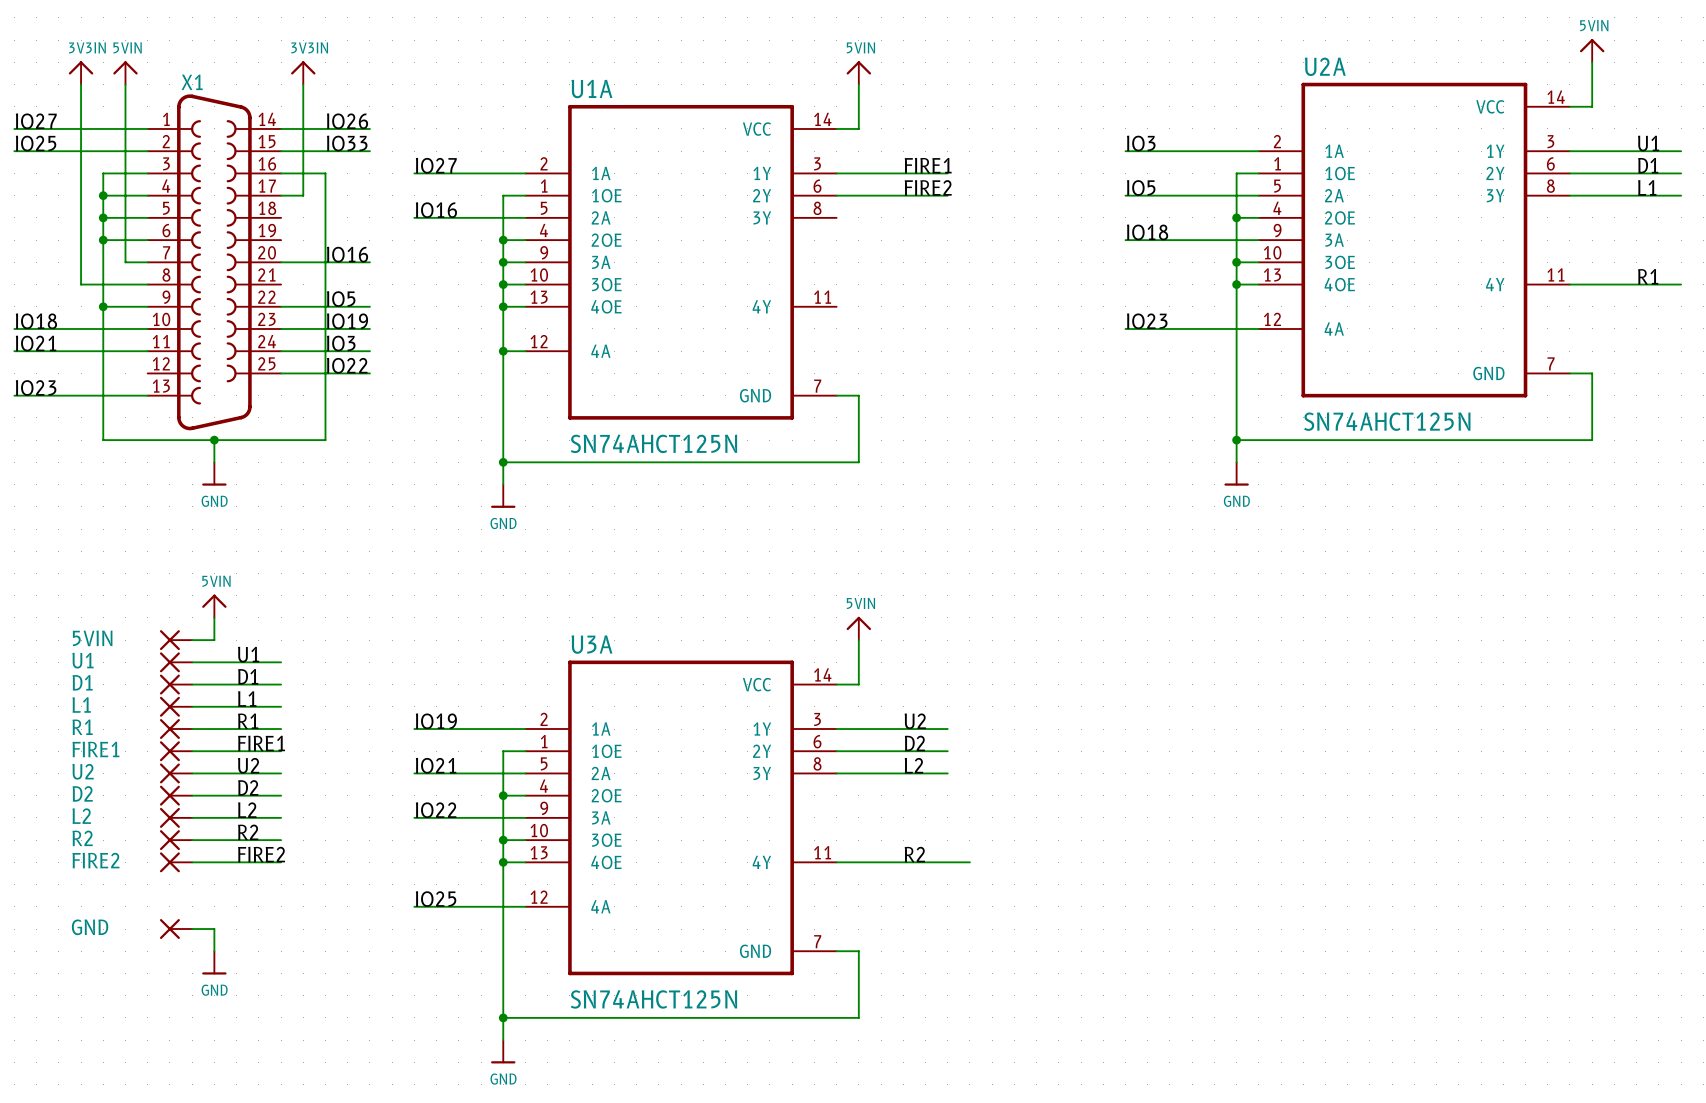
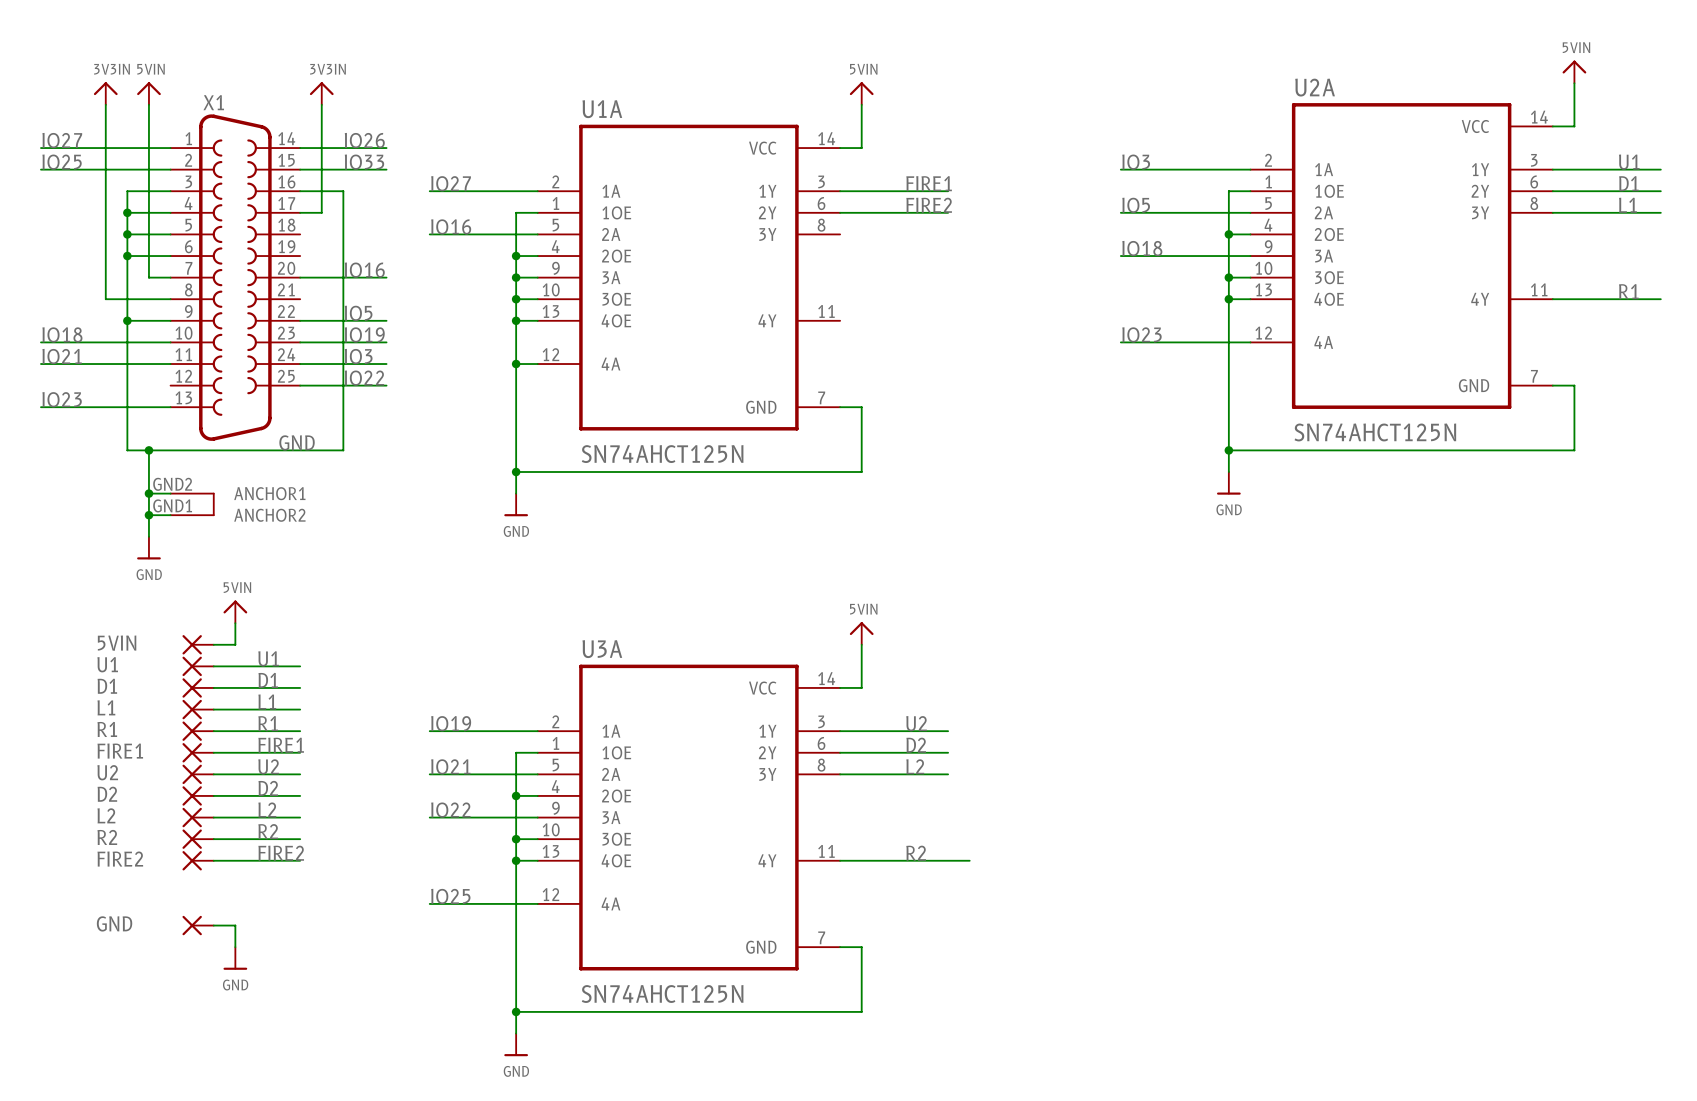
X1 symbol: [147, 94, 282, 431] -> [170, 114, 301, 516]
label: none -> GND (297, 442)
wire: none -> (148, 450) (148, 536)
junction: none -> (148, 450)
wire: (214, 440) (214, 462) -> none
junction: (214, 440) -> none
power symbol position: GND (214, 474) -> GND (148, 548)
wire: none -> (148, 493) (170, 493)
junction: none -> (148, 493)
wire: none -> (148, 515) (170, 515)
junction: none -> (148, 515)

